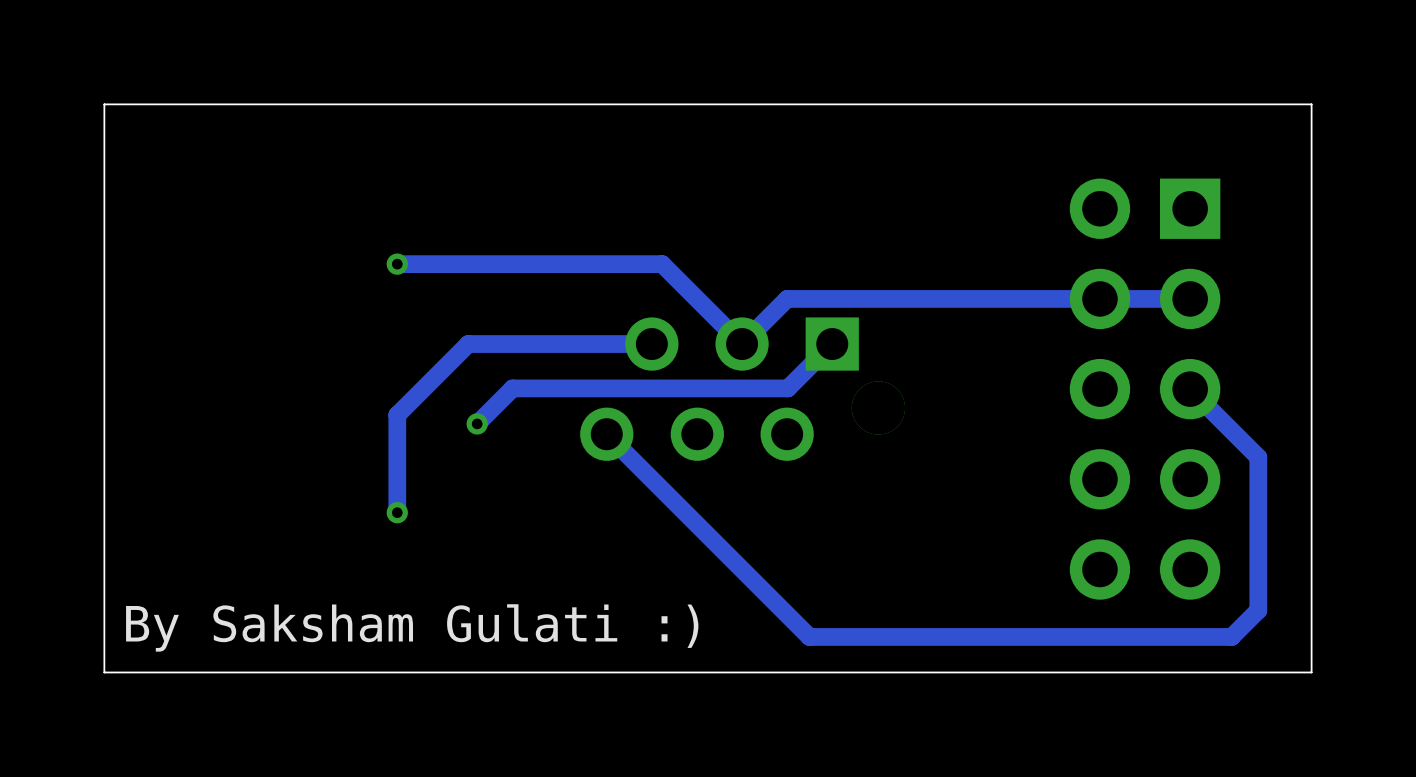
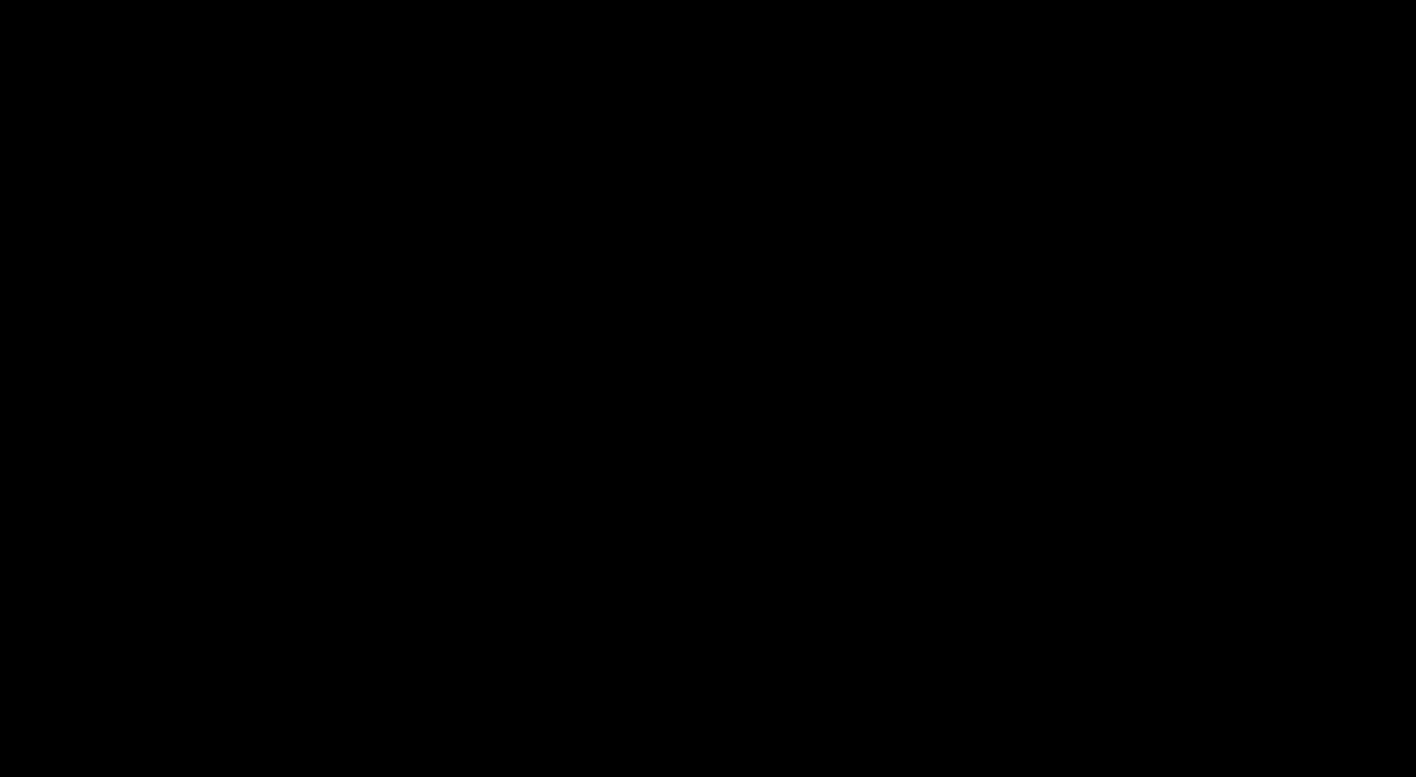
board edge: (1311, 104) (104, 104) (104, 672) (1311, 672) (1311, 104) -> none
track: (397, 264) (662, 264) (742, 344) (787, 298) (1190, 298) -> none
via: (397, 264) -> none
track: (651, 344) (468, 344) (397, 415) (397, 512) -> none
track: (832, 344) (787, 388) (512, 388) (477, 423) -> none
part: (742, 389) -> none
part: (1145, 389) -> none
track: (1190, 389) (1258, 457) (1258, 610) (1231, 636) (809, 636) (606, 434) -> none
via: (477, 423) -> none
via: (397, 512) -> none
text: By Saksham Gulati :) (412, 627) -> none

